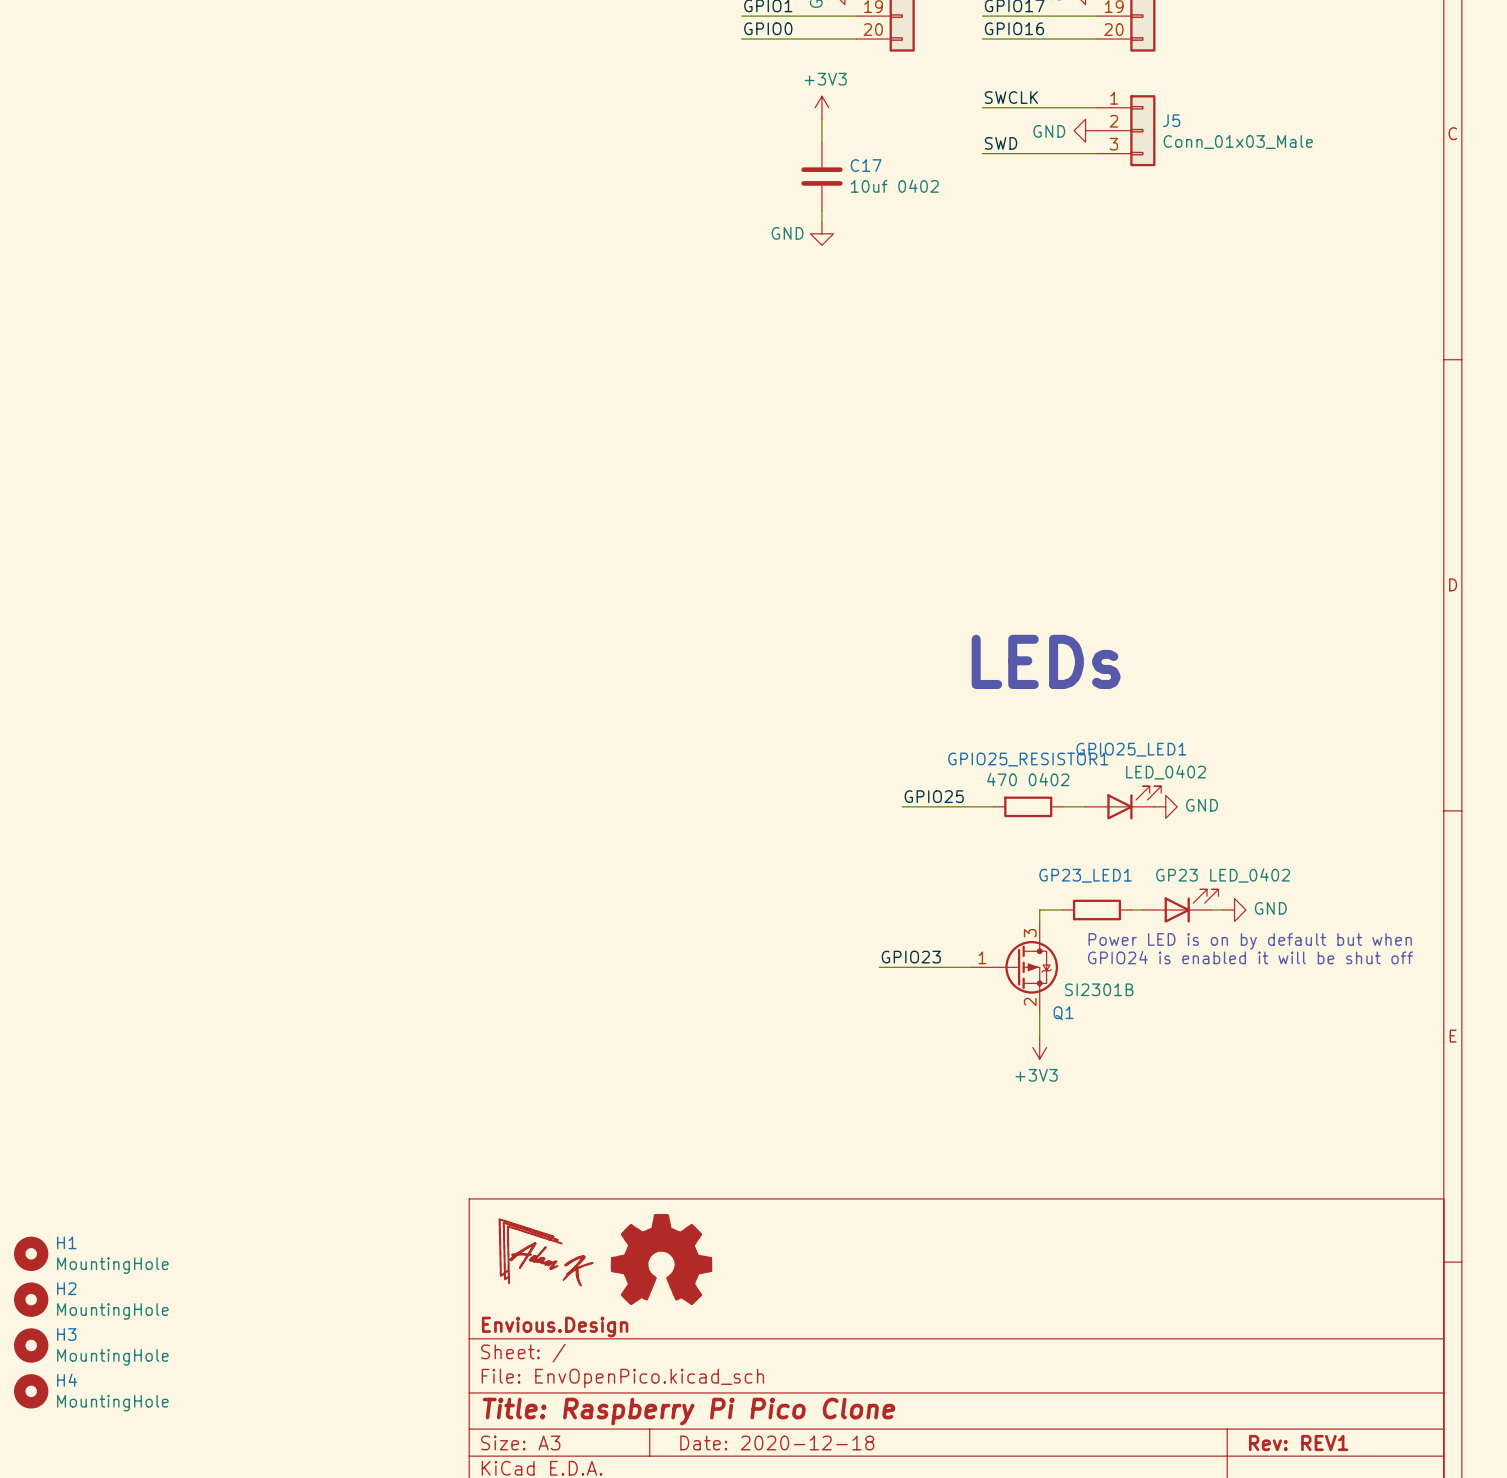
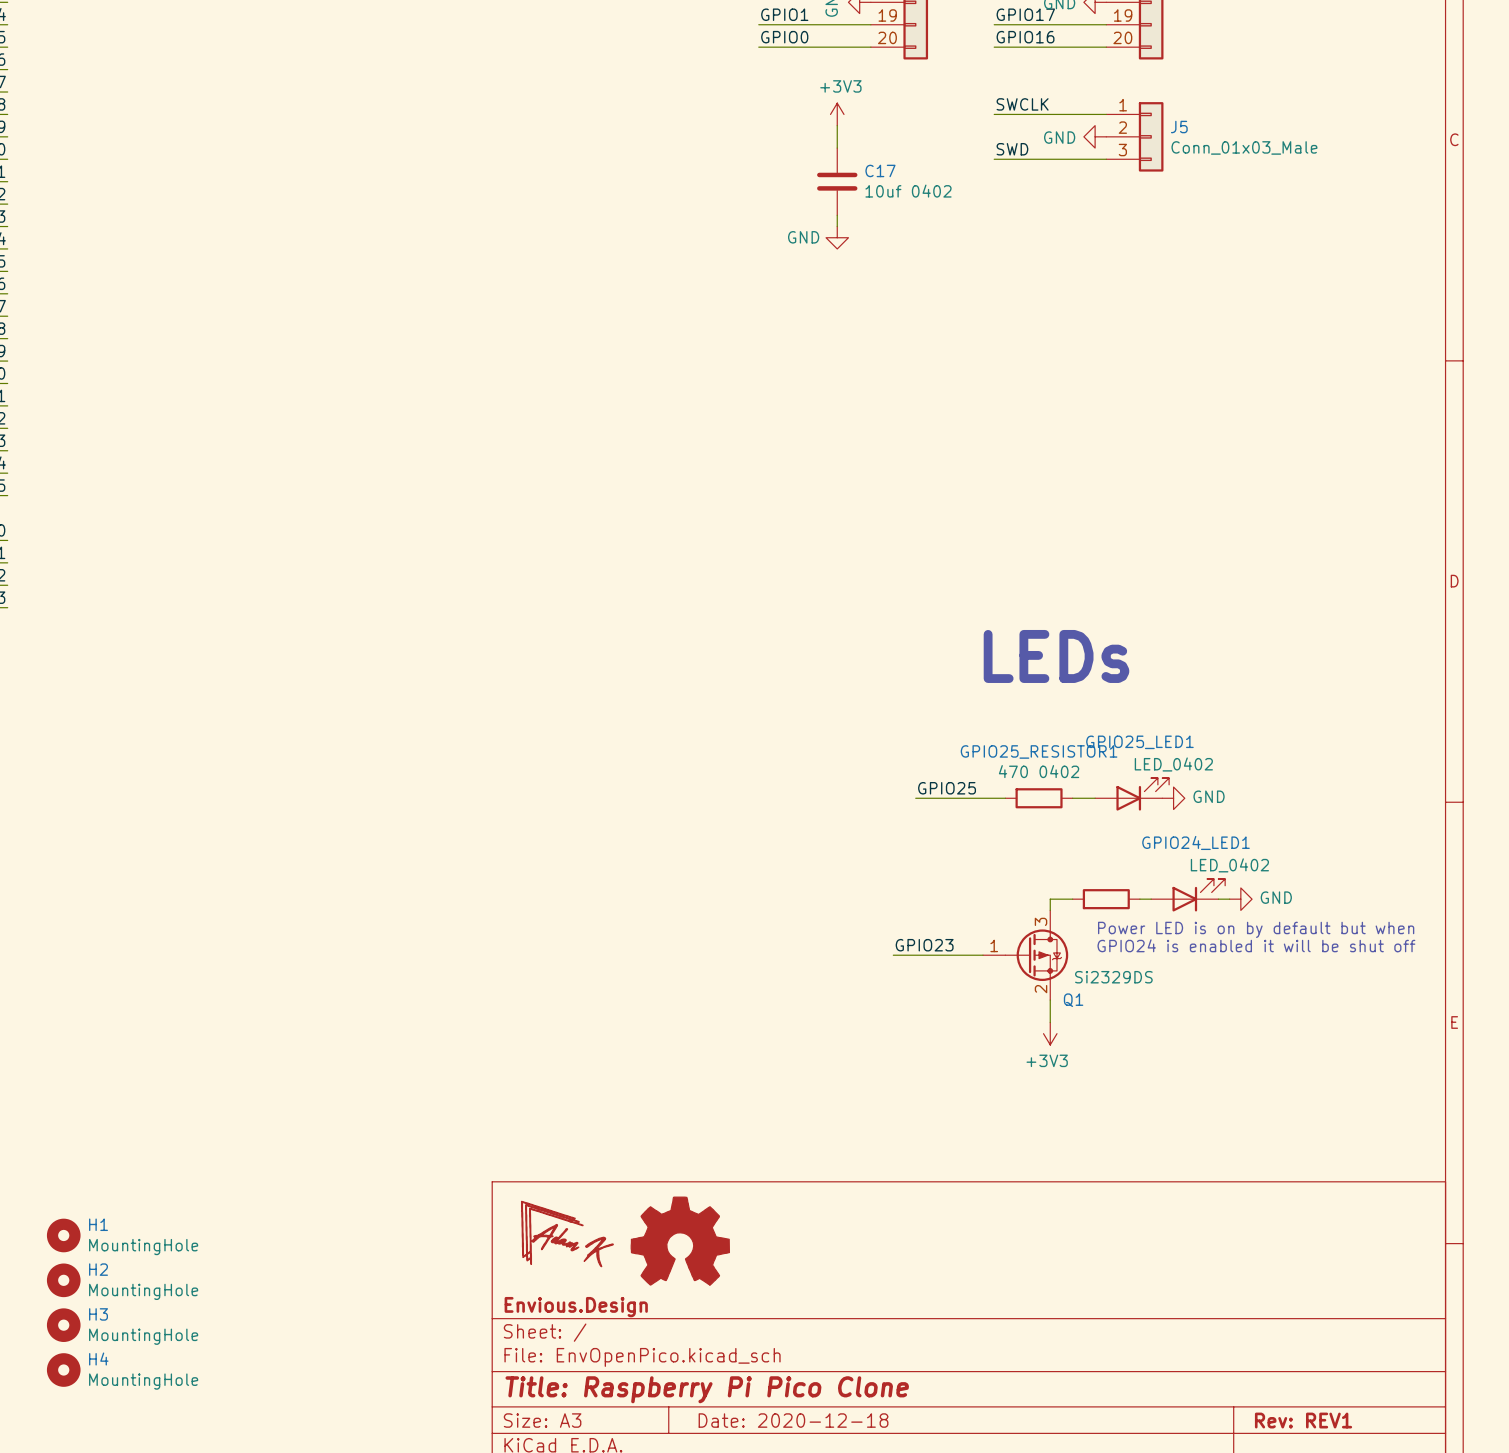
GP23_LED1 name: GP23_LED1 (1085, 875) -> GPIO24_LED1 (1196, 842)
GP23_LED1 value: GP23 LED_0402 (1223, 875) -> LED_0402 (1229, 865)
Q1 value: SI2301B (1099, 989) -> Si2329DS (1113, 977)

